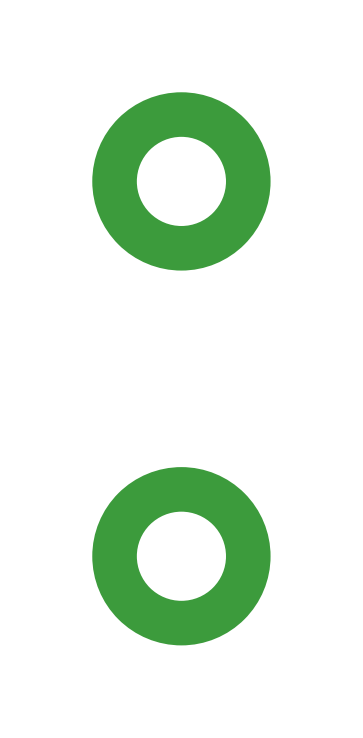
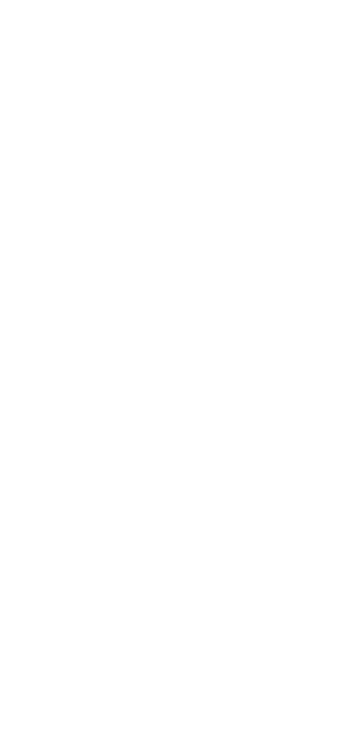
part: (181, 181) -> none
part: (181, 556) -> none

